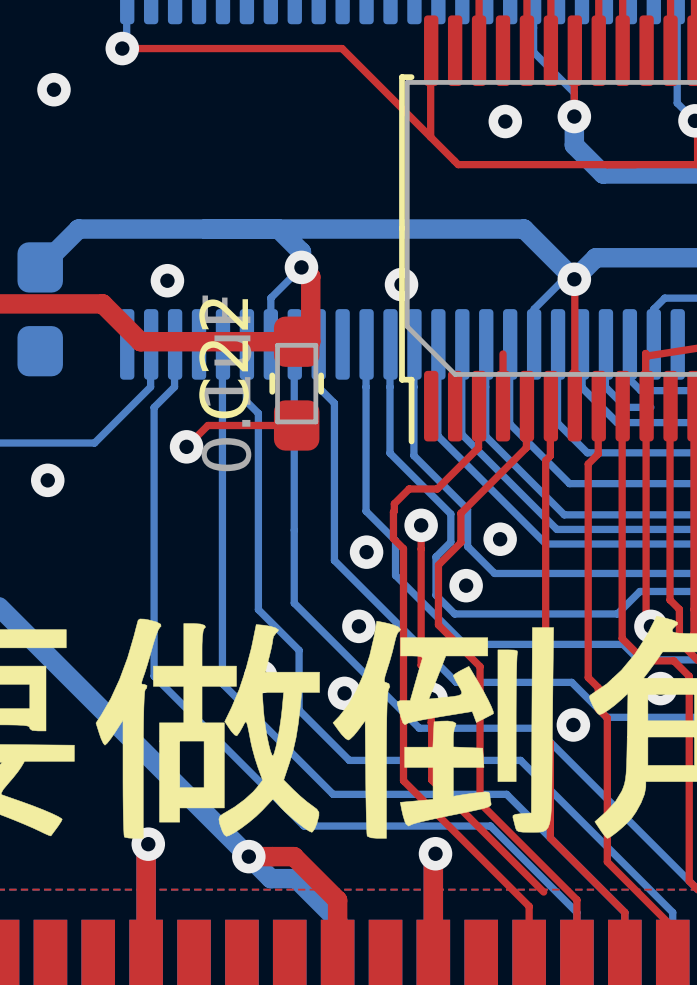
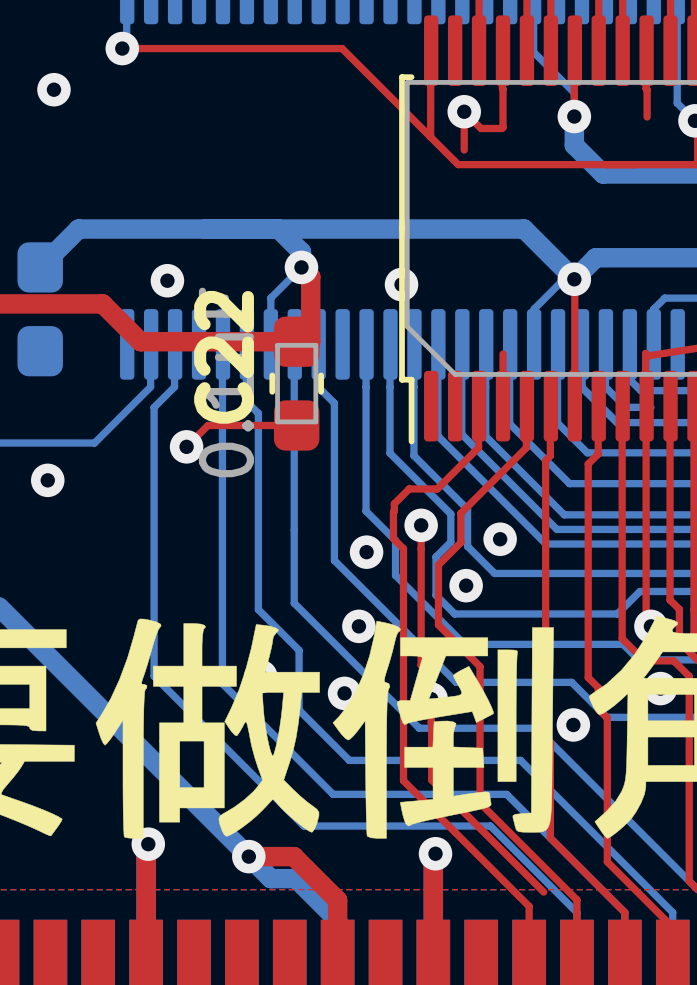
top track: none -> (646, 57) (647, 117)
top track: none -> (503, 89) (502, 128) (480, 128) (464, 111) (464, 150)
via position: (505, 121) -> (464, 111)

